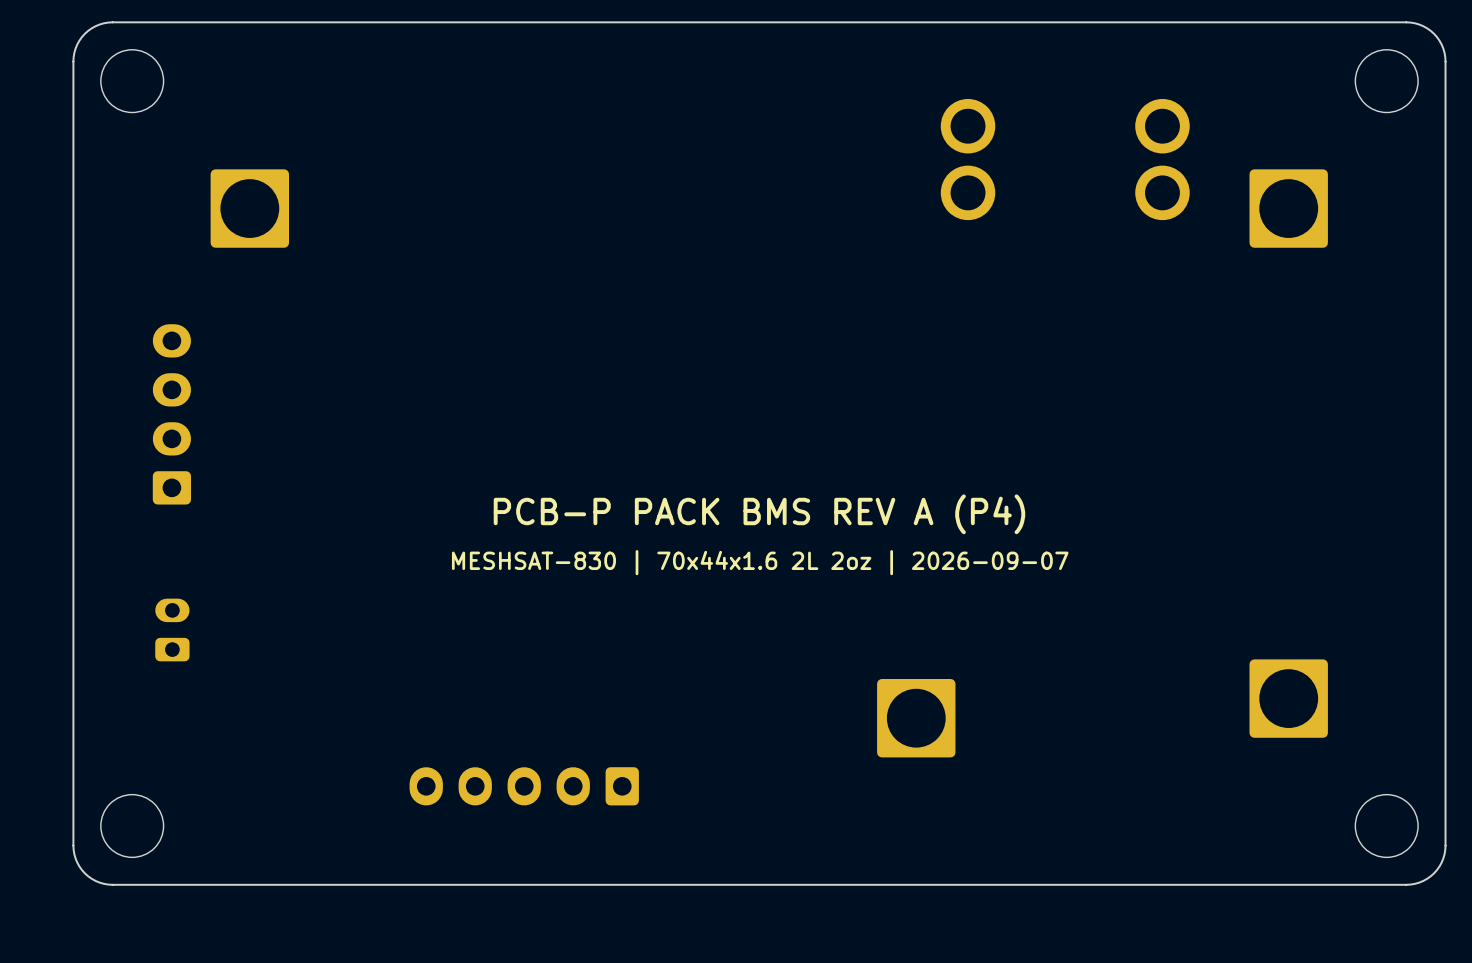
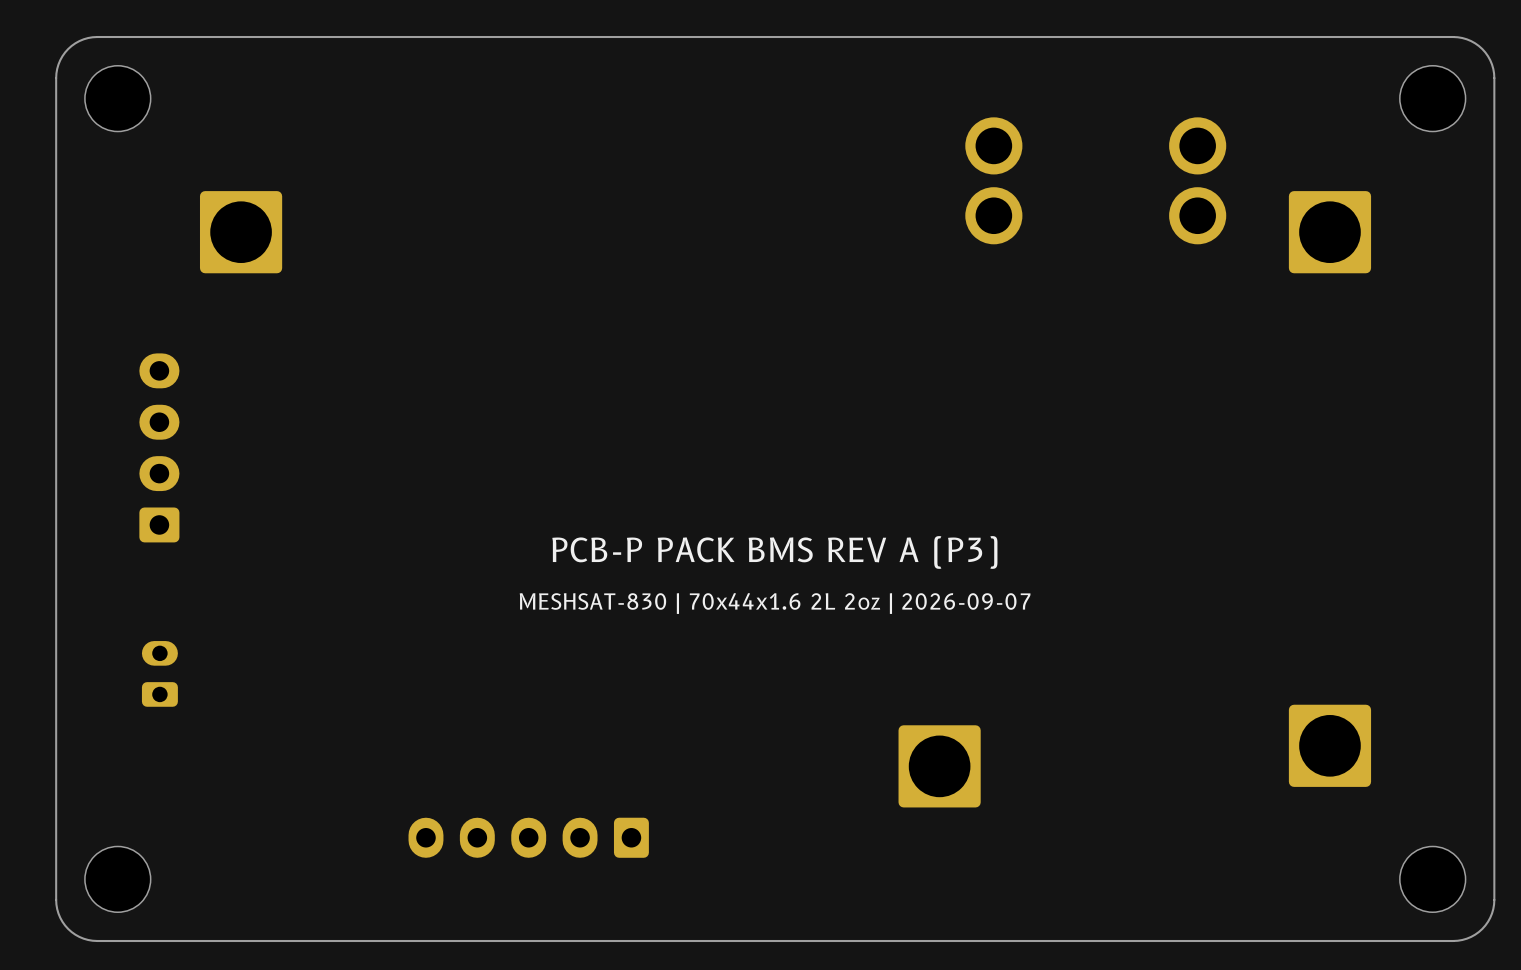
text: PCB-P PACK BMS REV A (P4) (759, 514) -> PCB-P PACK BMS REV A (P3) (774, 552)

